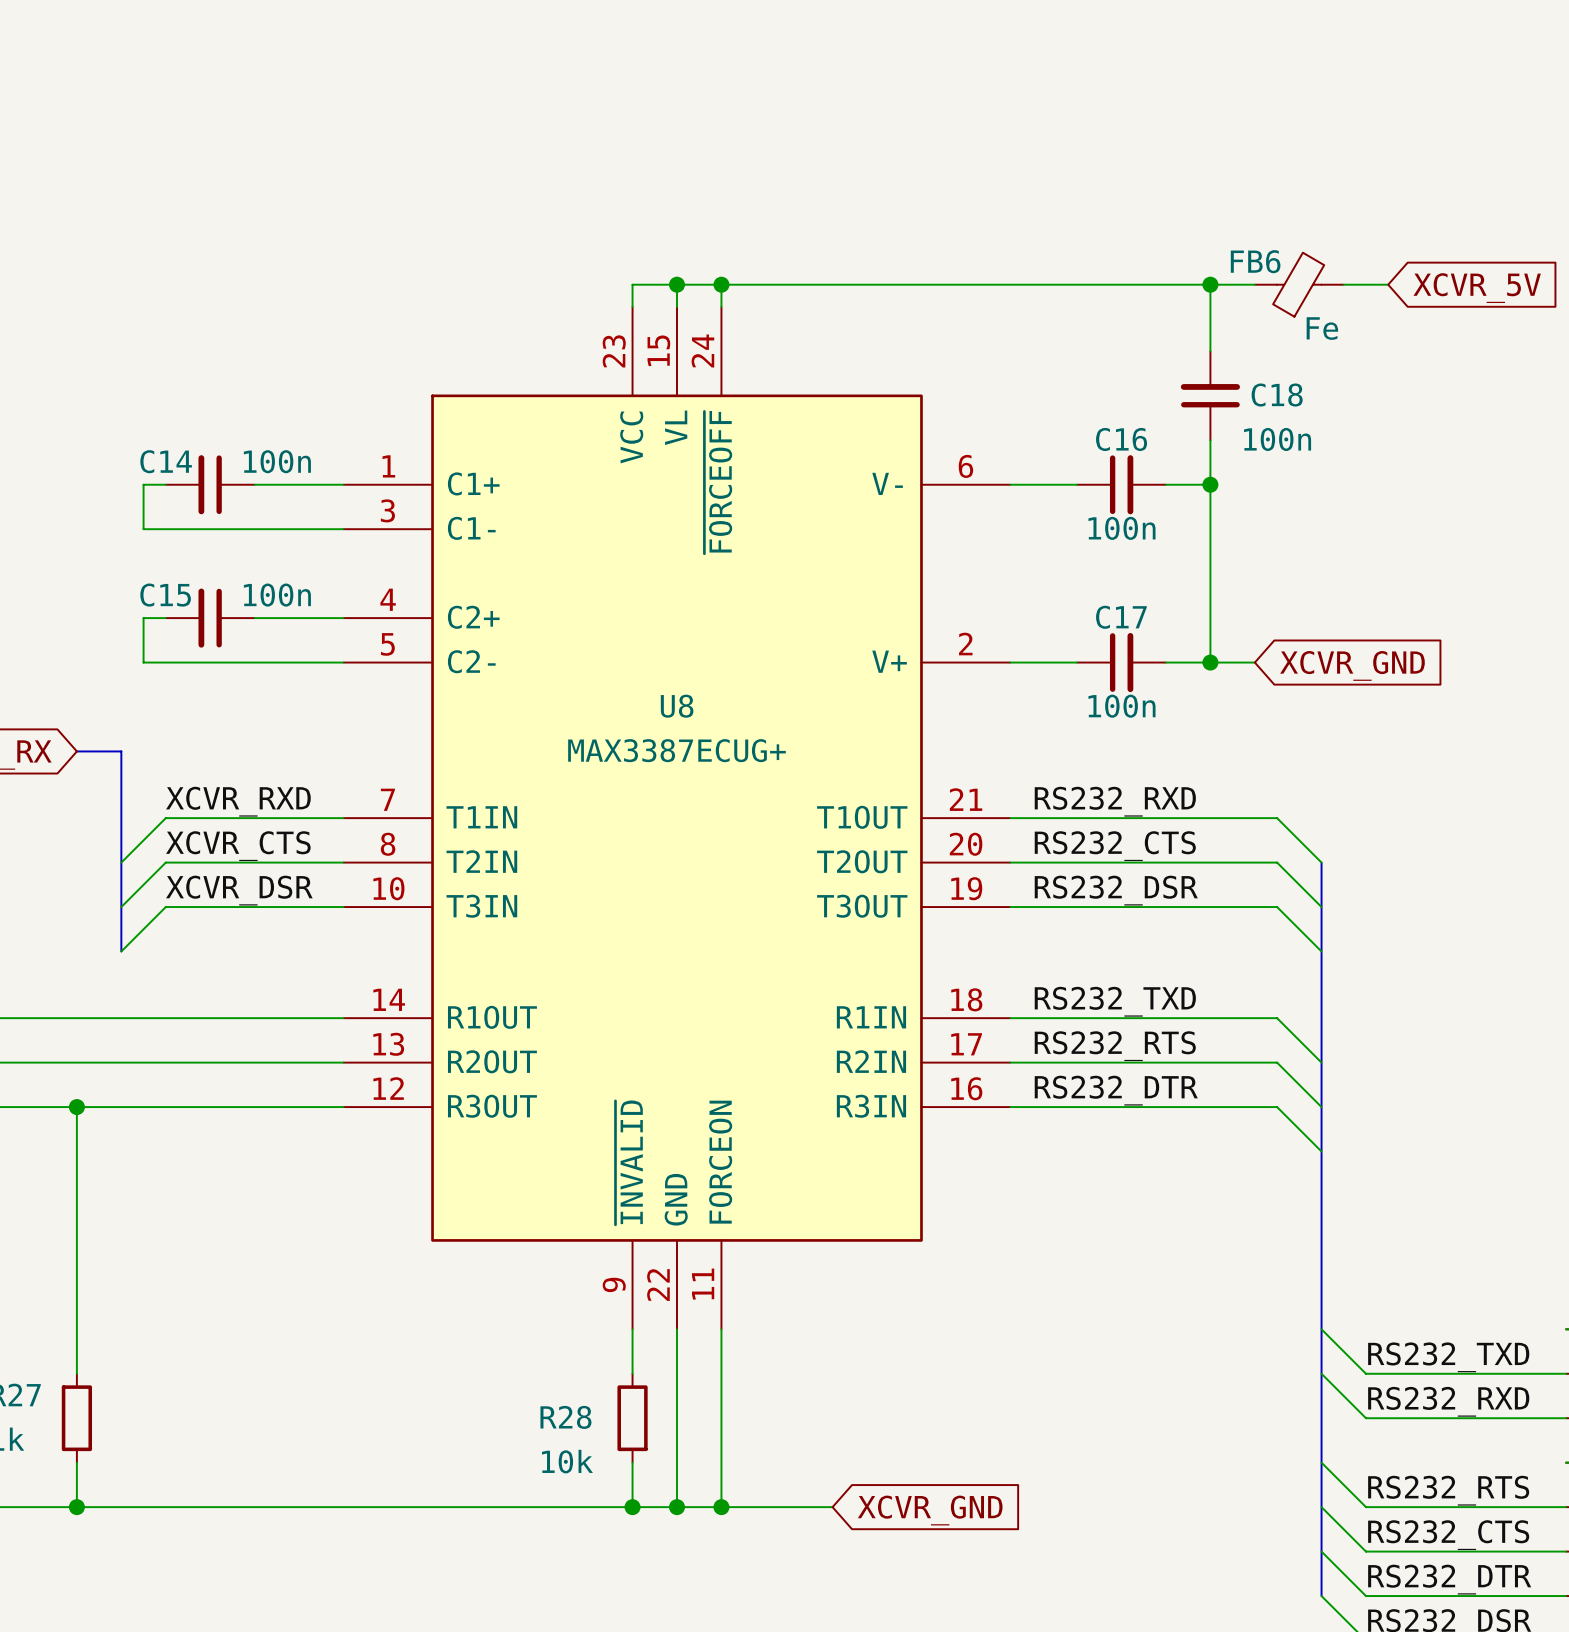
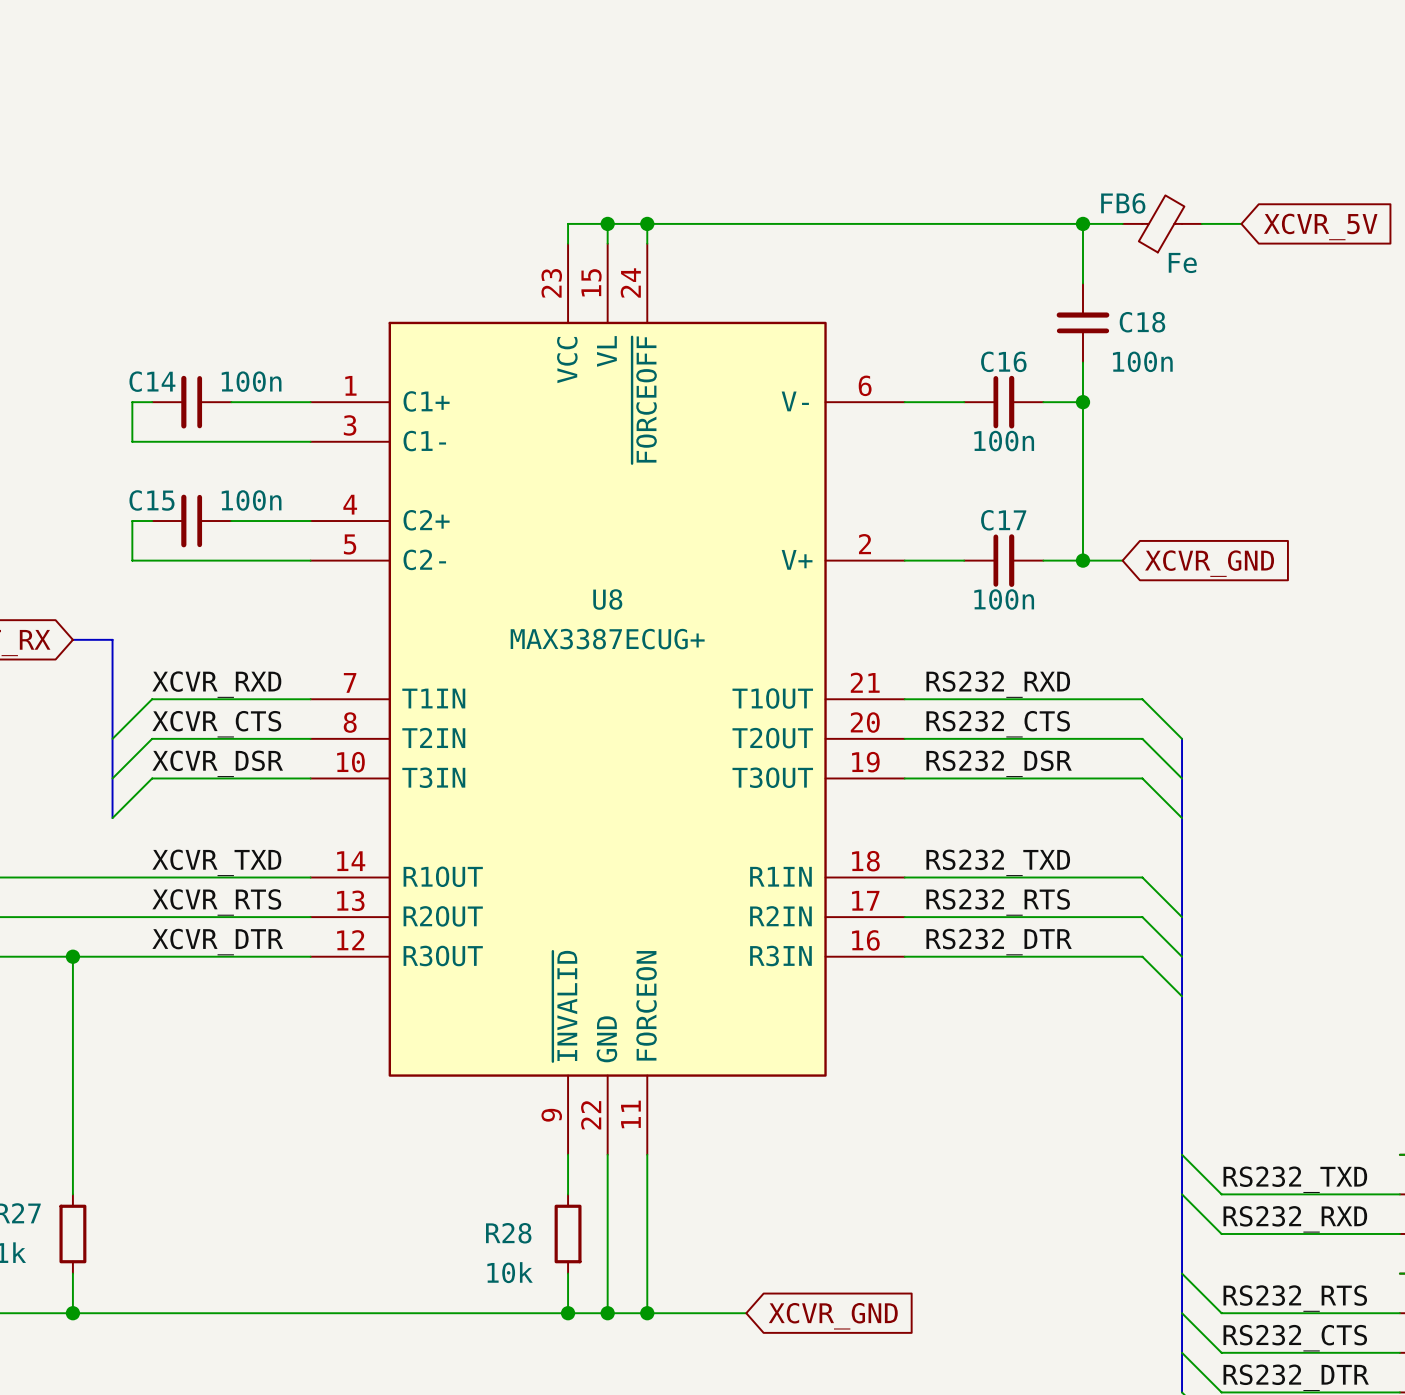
label: none -> XCVR_TXD (216, 862)
label: none -> XCVR_RTS (216, 902)
label: none -> XCVR_DTR (217, 942)

